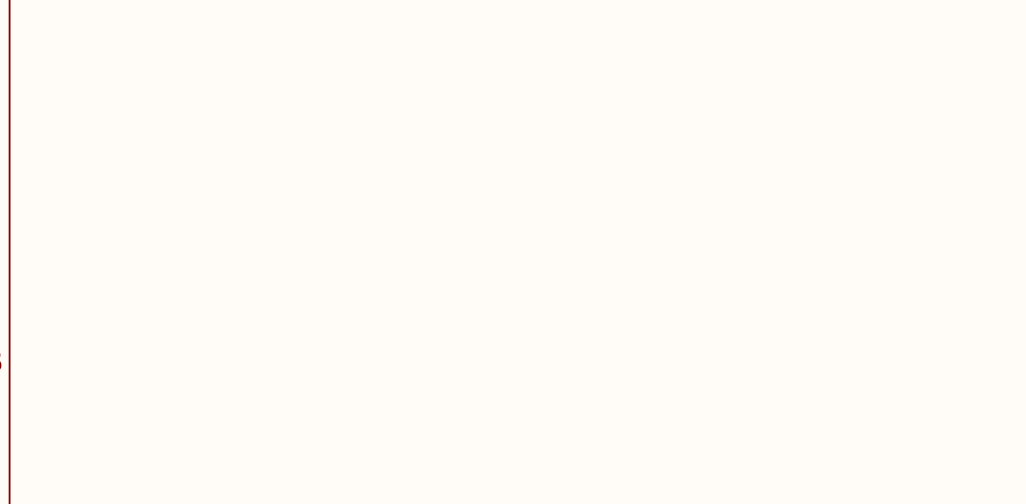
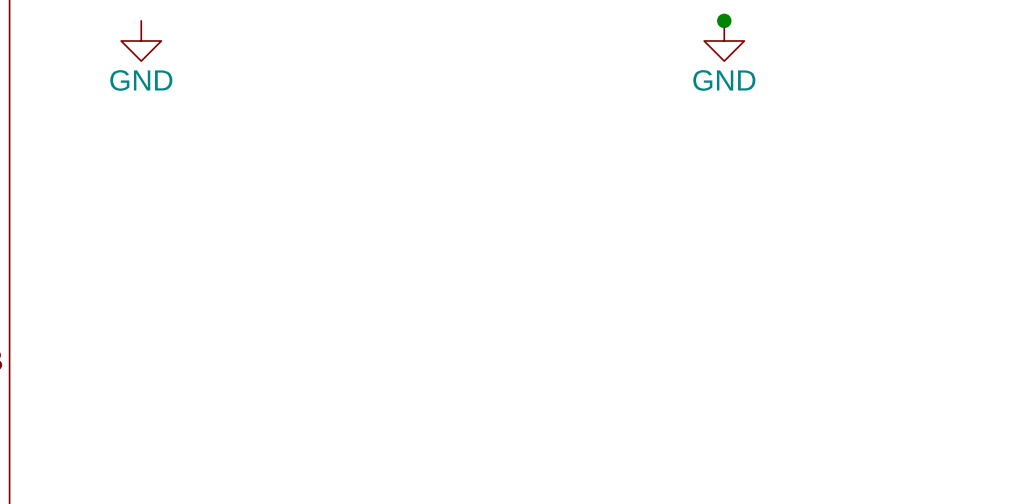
junction: none -> (724, 20)
power symbol: none -> GND (141, 41)
power symbol: none -> GND (724, 41)

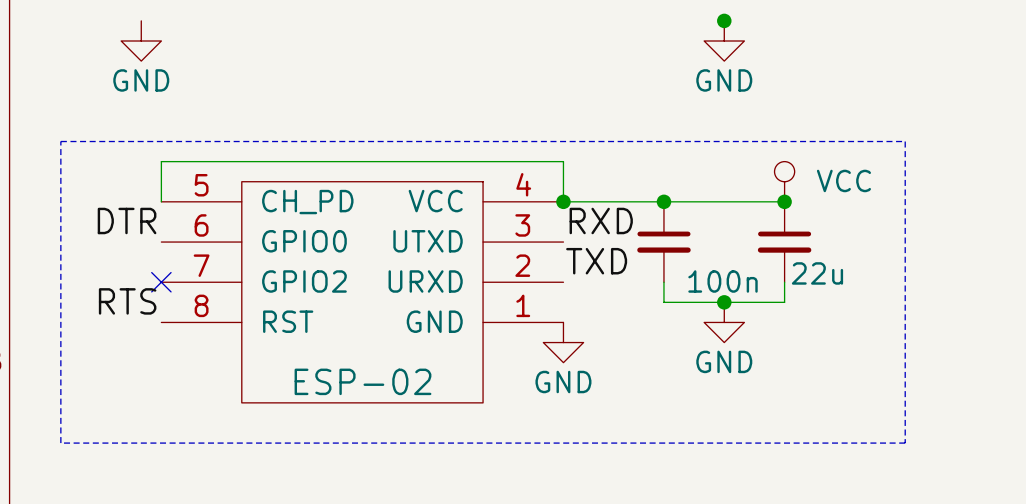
line: none -> (60, 141) (905, 141) (905, 443) (60, 443) (60, 141)
power symbol: none -> VCC (784, 181)
wire: none -> (161, 201) (161, 161) (563, 161) (563, 201) (784, 201)
junction: none -> (563, 201)
junction: none -> (663, 201)
junction: none -> (784, 201)
label: none -> DTR (127, 220)
label: none -> RXD (601, 220)
part: none -> 100n (663, 242)
part: none -> 22u (784, 242)
label: none -> TXD (596, 261)
no-connect mark: none -> (161, 282)
wire: none -> (663, 282) (663, 302) (784, 302) (784, 282)
part: none -> ESP-02 (362, 292)
label: none -> RTS (127, 301)
junction: none -> (724, 302)
power symbol: none -> GND (724, 322)
power symbol: none -> GND (563, 342)

